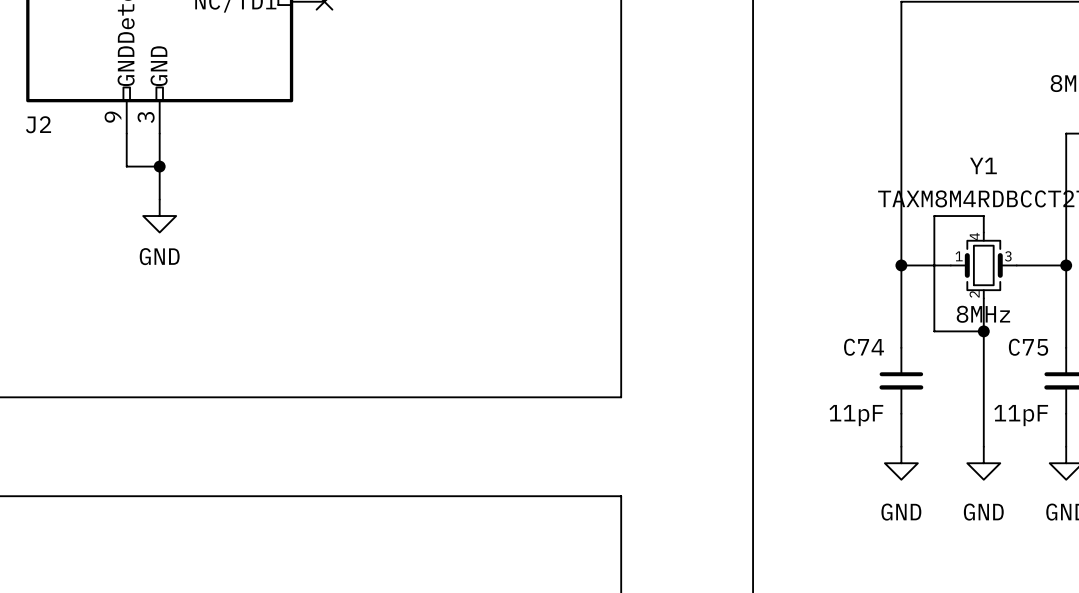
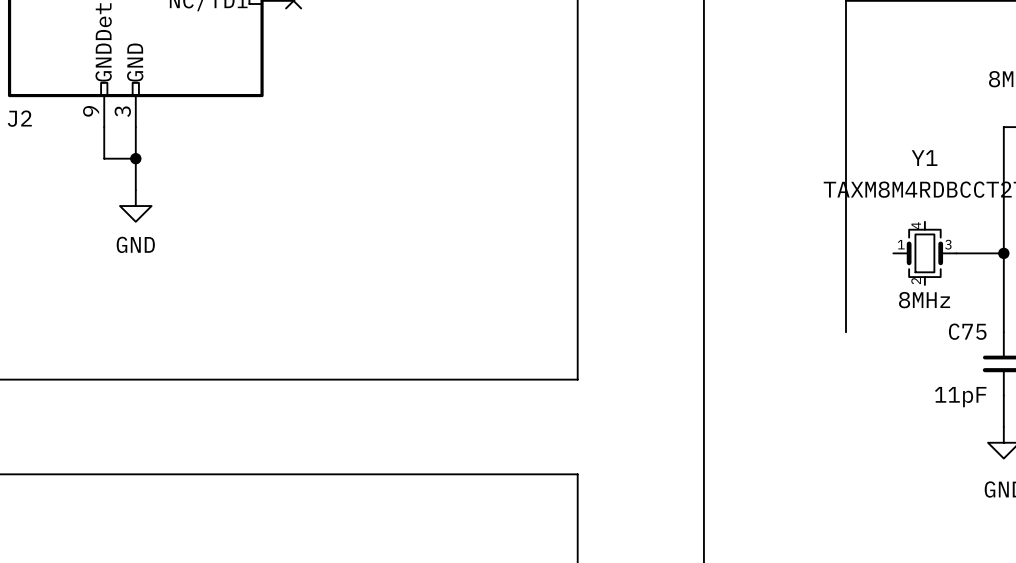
wire: (983, 232) (983, 216) (934, 216) (934, 331) (983, 331) -> none
wire: (901, 265) (950, 265) -> none
junction: (901, 265) -> none
wire: (983, 298) (983, 446) -> none
junction: (983, 331) -> none
C74: 11pF (901, 380) -> none
wire: (901, 413) (901, 446) -> none
power symbol: GND (901, 463) -> none
power symbol: GND (983, 463) -> none

